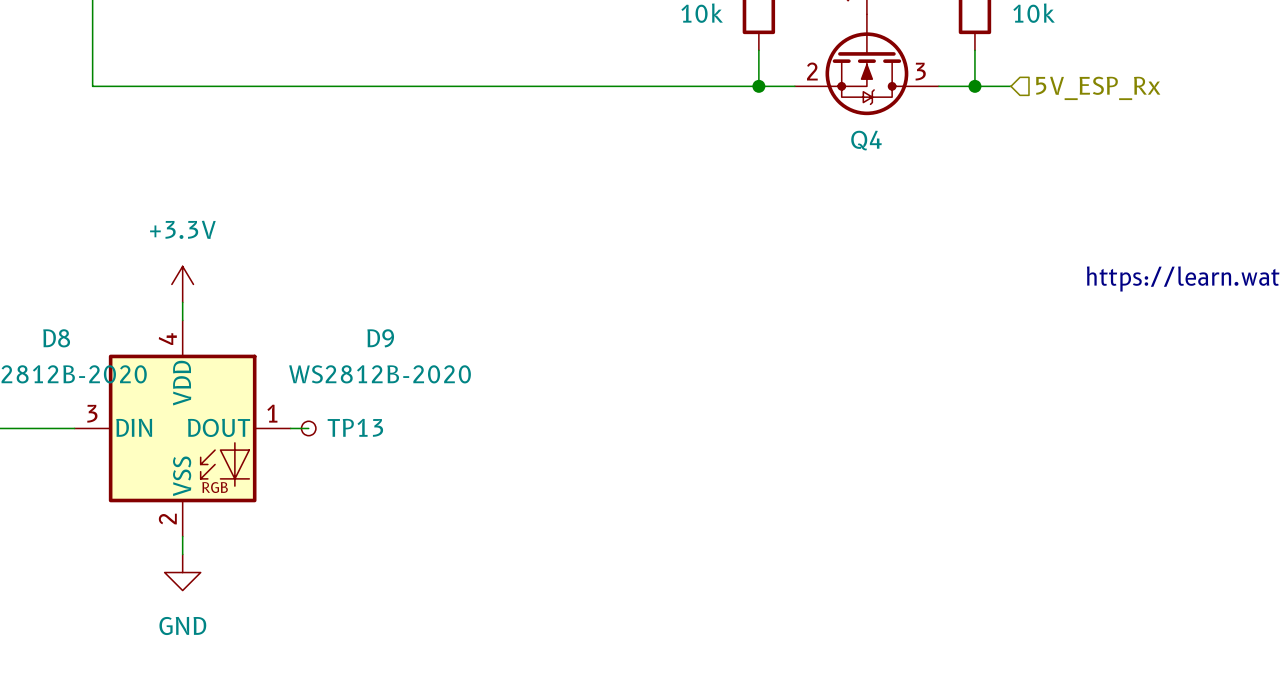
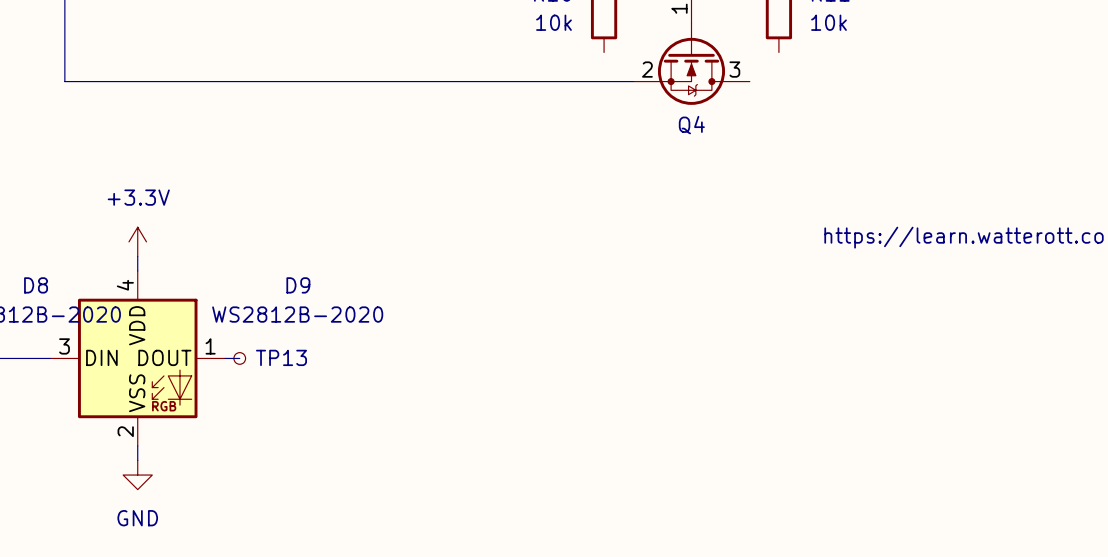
wire: (758, 50) (758, 86) -> none
wire: (974, 50) (974, 86) -> none
junction: (758, 86) -> none
wire: (938, 86) (1010, 86) -> none
junction: (974, 86) -> none
hierarchical label: 5V_ESP_Rx (1098, 88) -> none

